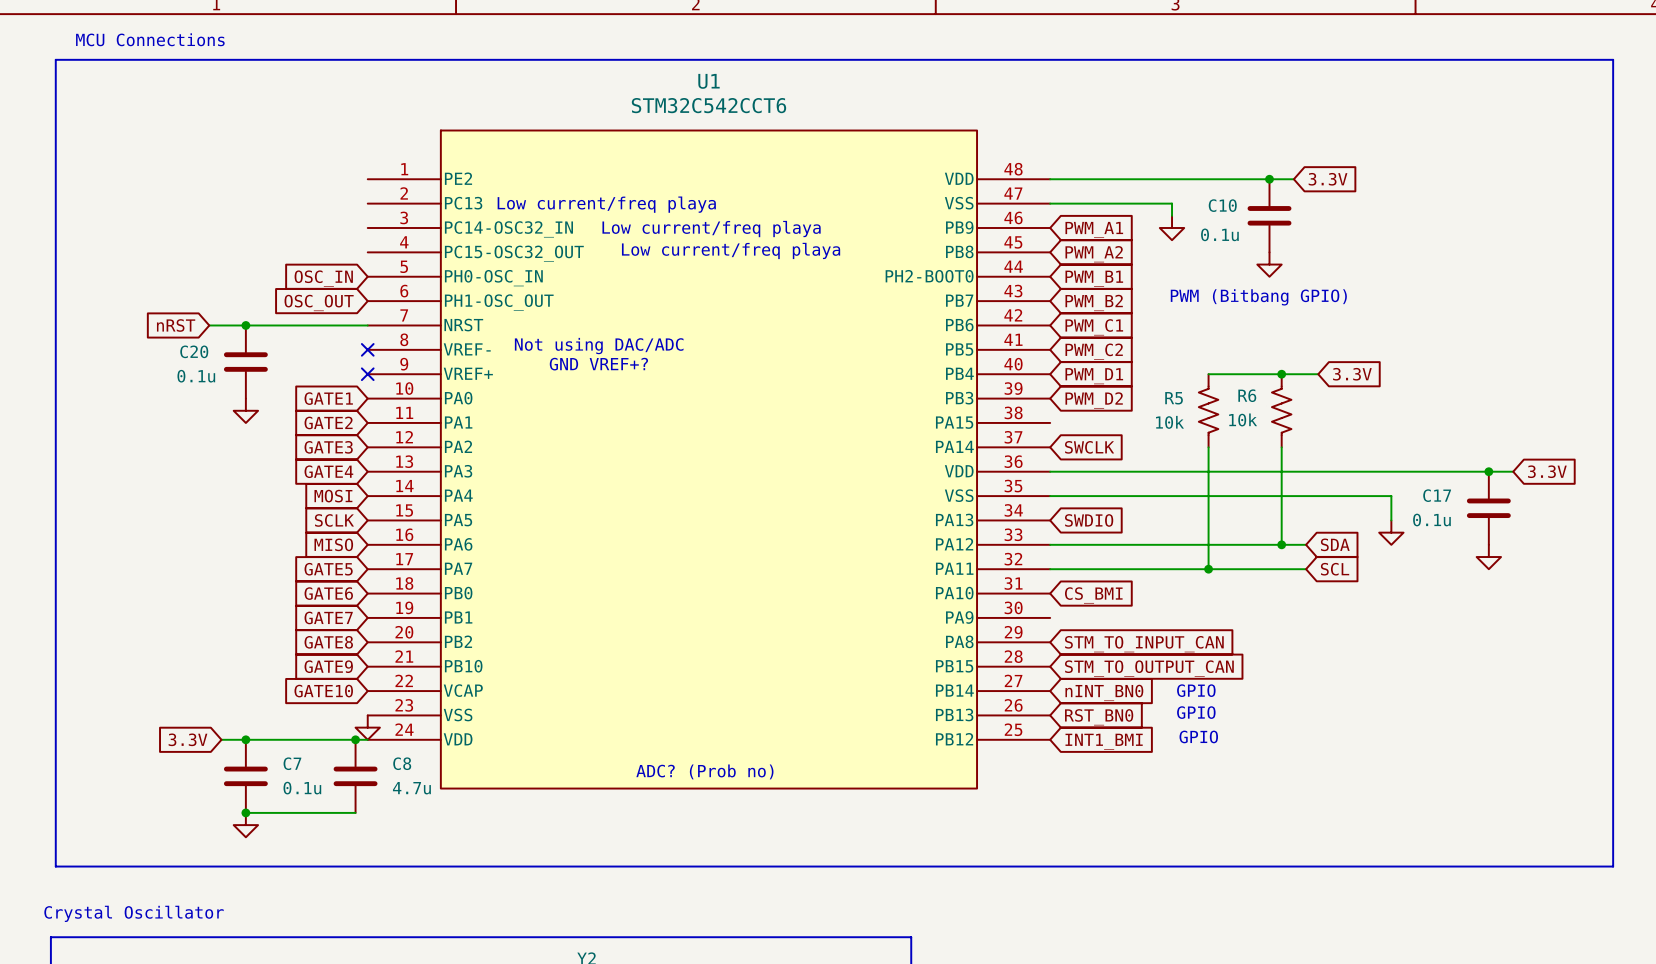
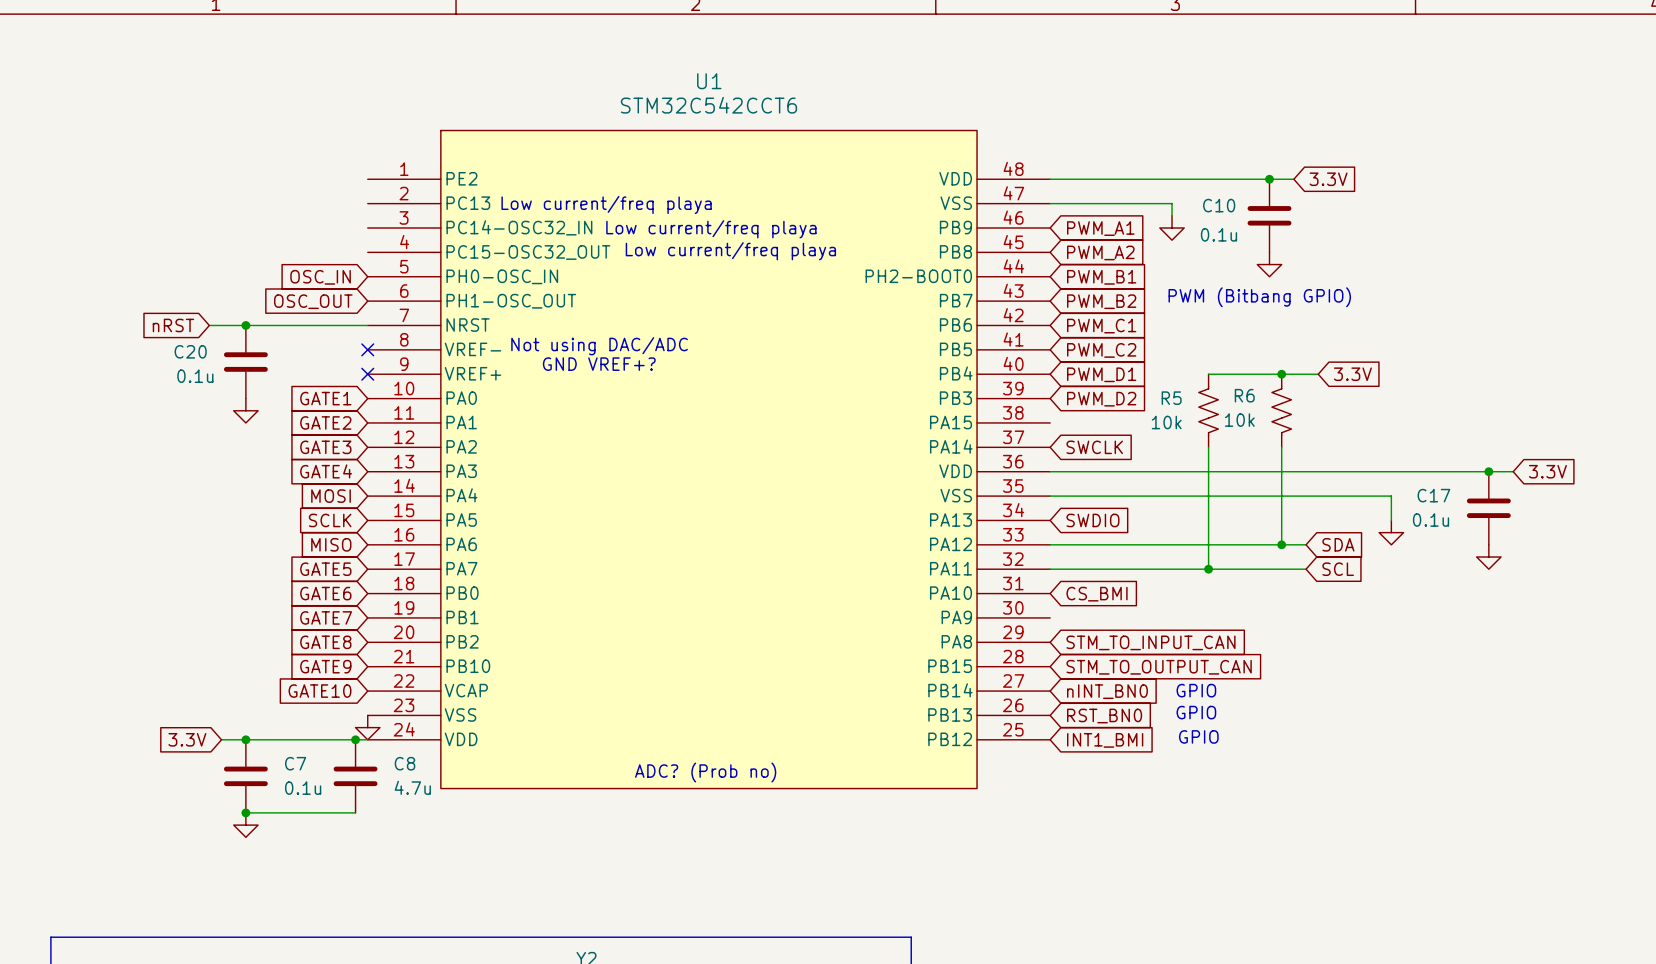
text: MCU Connections (150, 39) -> none
line: (55, 59) (1613, 59) (1613, 866) (55, 866) (55, 59) -> none
text: Crystal Oscillator (134, 913) -> none

